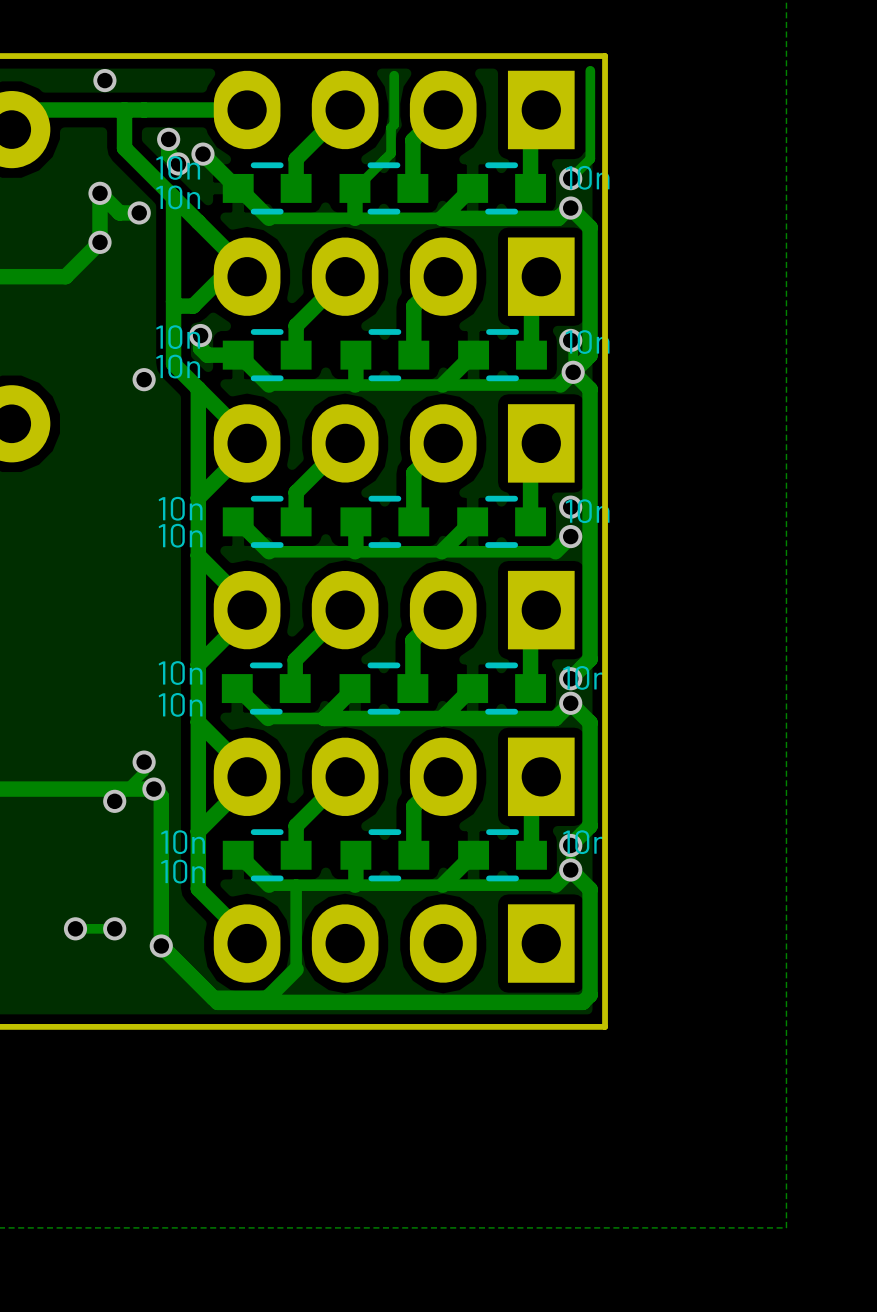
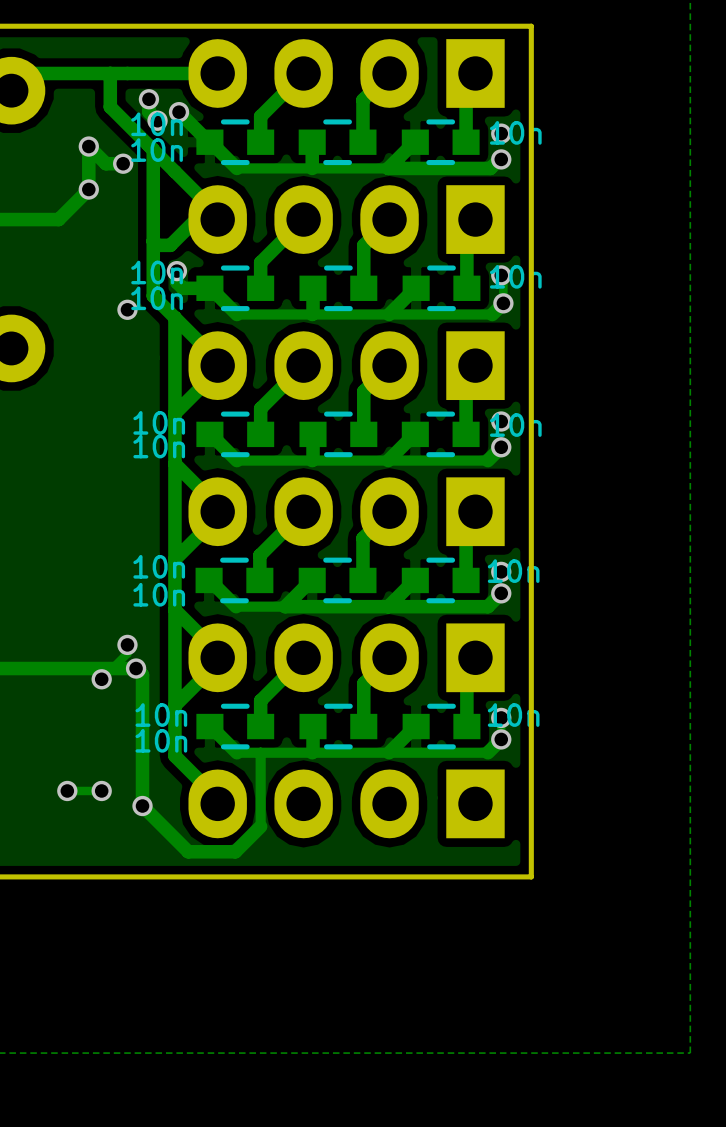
track: (590, 70) (590, 159) (570, 178) -> none
track: (394, 75) (394, 124) (391, 127) (391, 153) (354, 188) -> none
via: (104, 80) -> none
track: (570, 208) (590, 227) (590, 355) (573, 372) (590, 389) (590, 659) (570, 678) -> none
track: (570, 703) (590, 722) (590, 826) (570, 845) -> none
track: (570, 869) (590, 889) (590, 995) (582, 1002) (217, 1002) (213, 998) -> none

